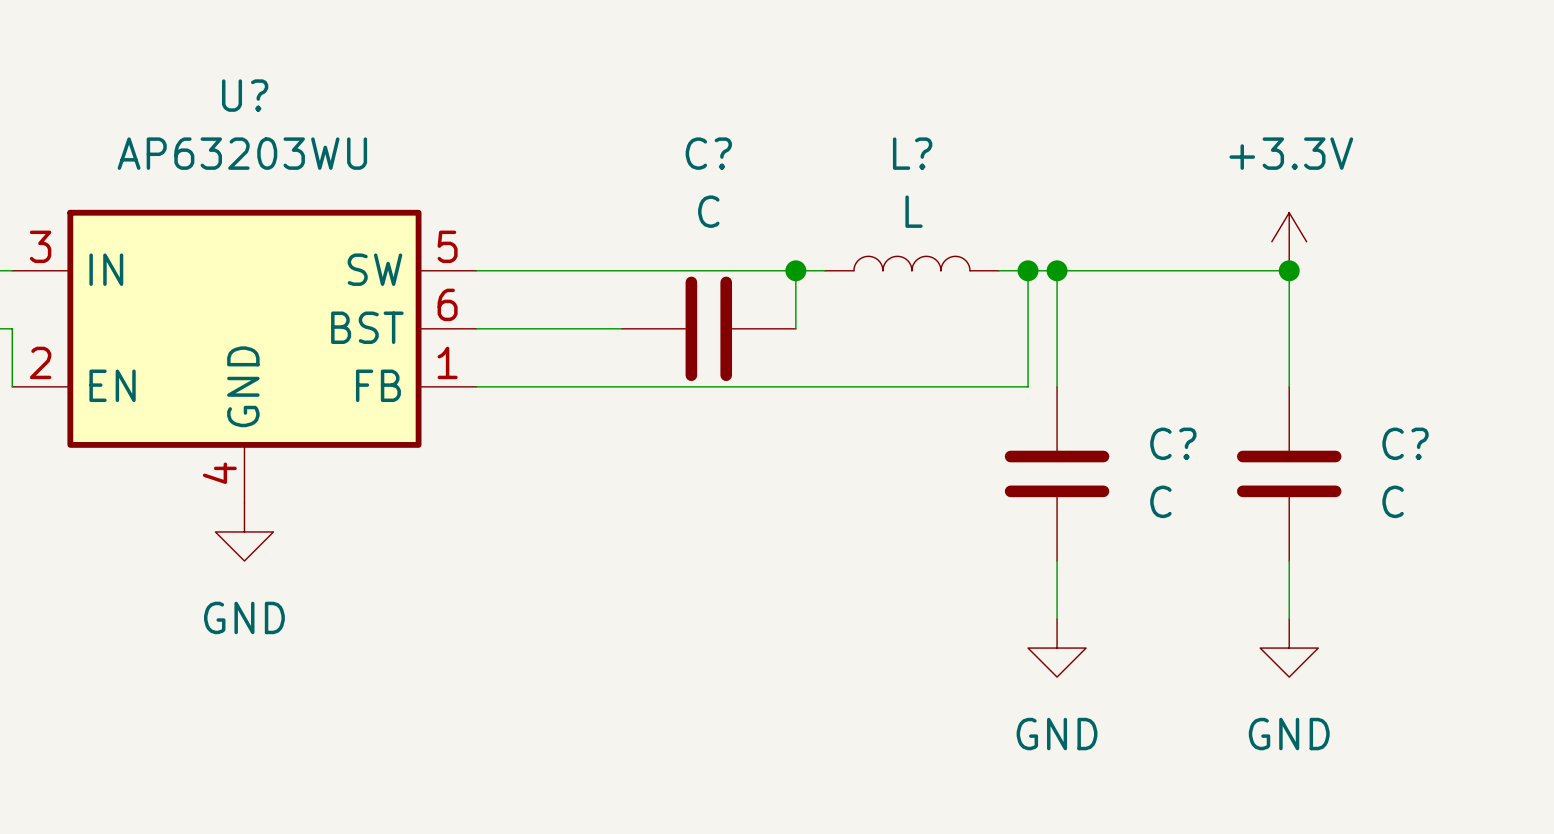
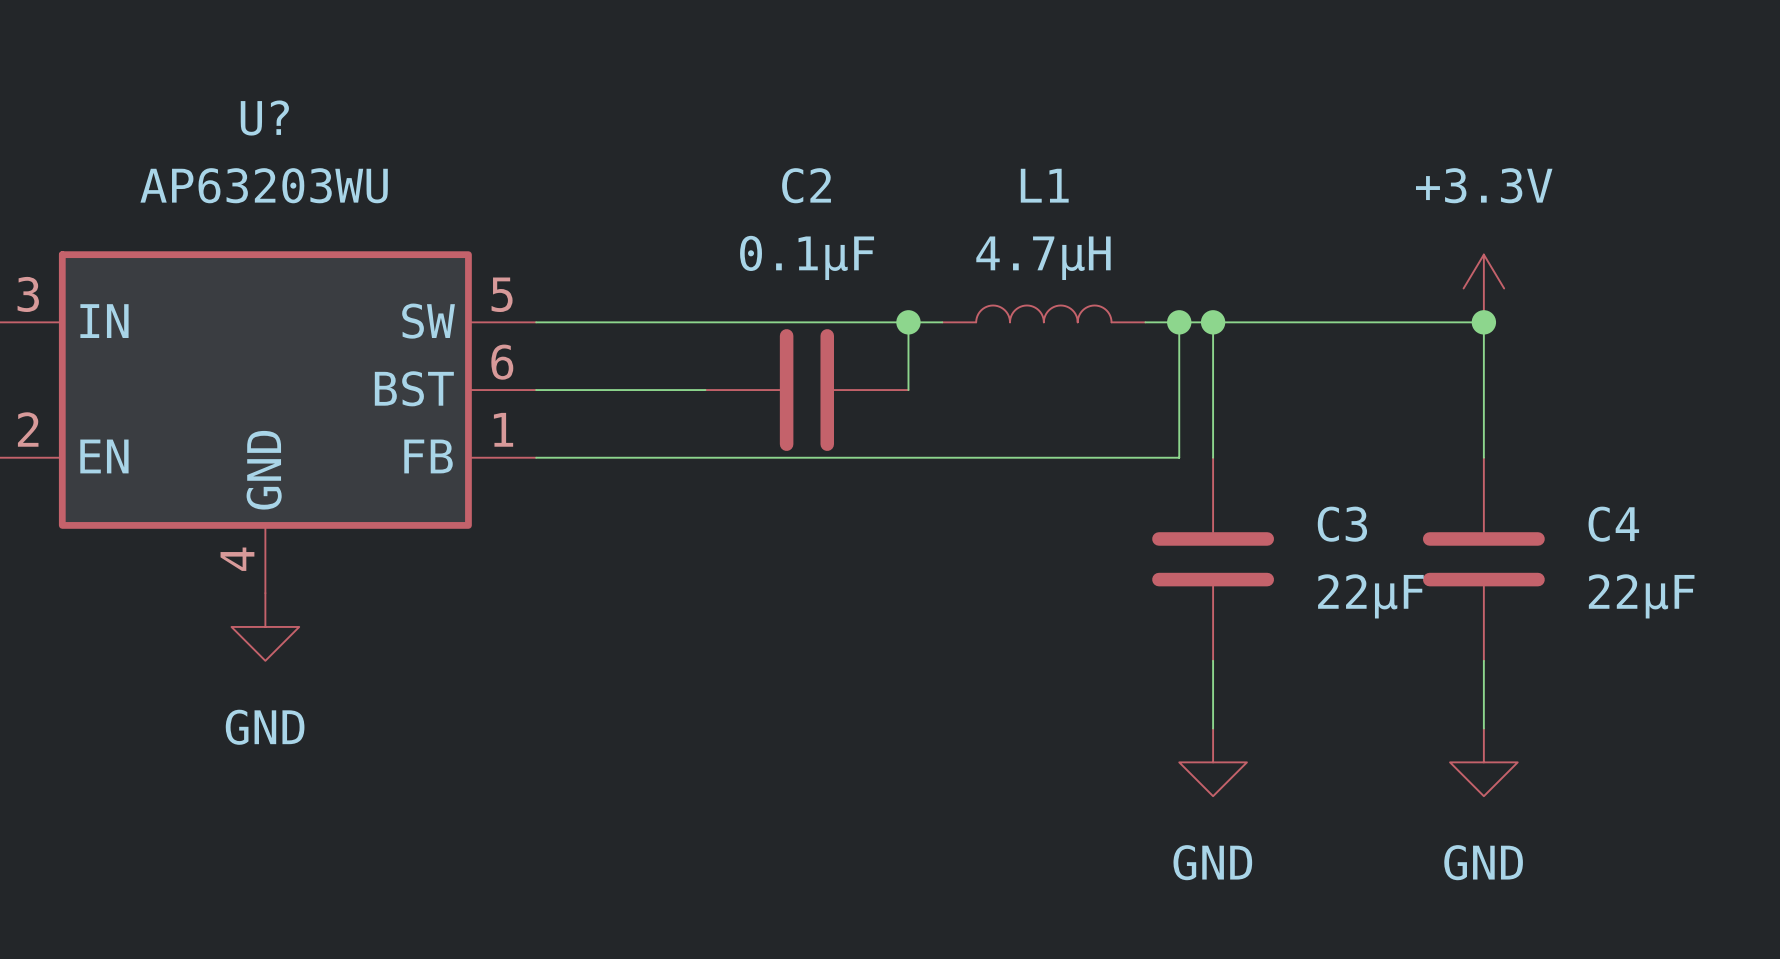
C? name: C? (708, 153) -> C2 (806, 185)
L? name: L? (912, 153) -> L1 (1044, 185)
C? value: C (708, 211) -> 0.1µF (807, 257)
L? value: L (914, 211) -> 4.7µH (1043, 258)
C? name: C? (1173, 443) -> C3 (1342, 524)
C? name: C? (1405, 443) -> C4 (1613, 524)
C? value: C (1160, 501) -> 22µF (1370, 596)
C? value: C (1393, 501) -> 22µF (1641, 596)

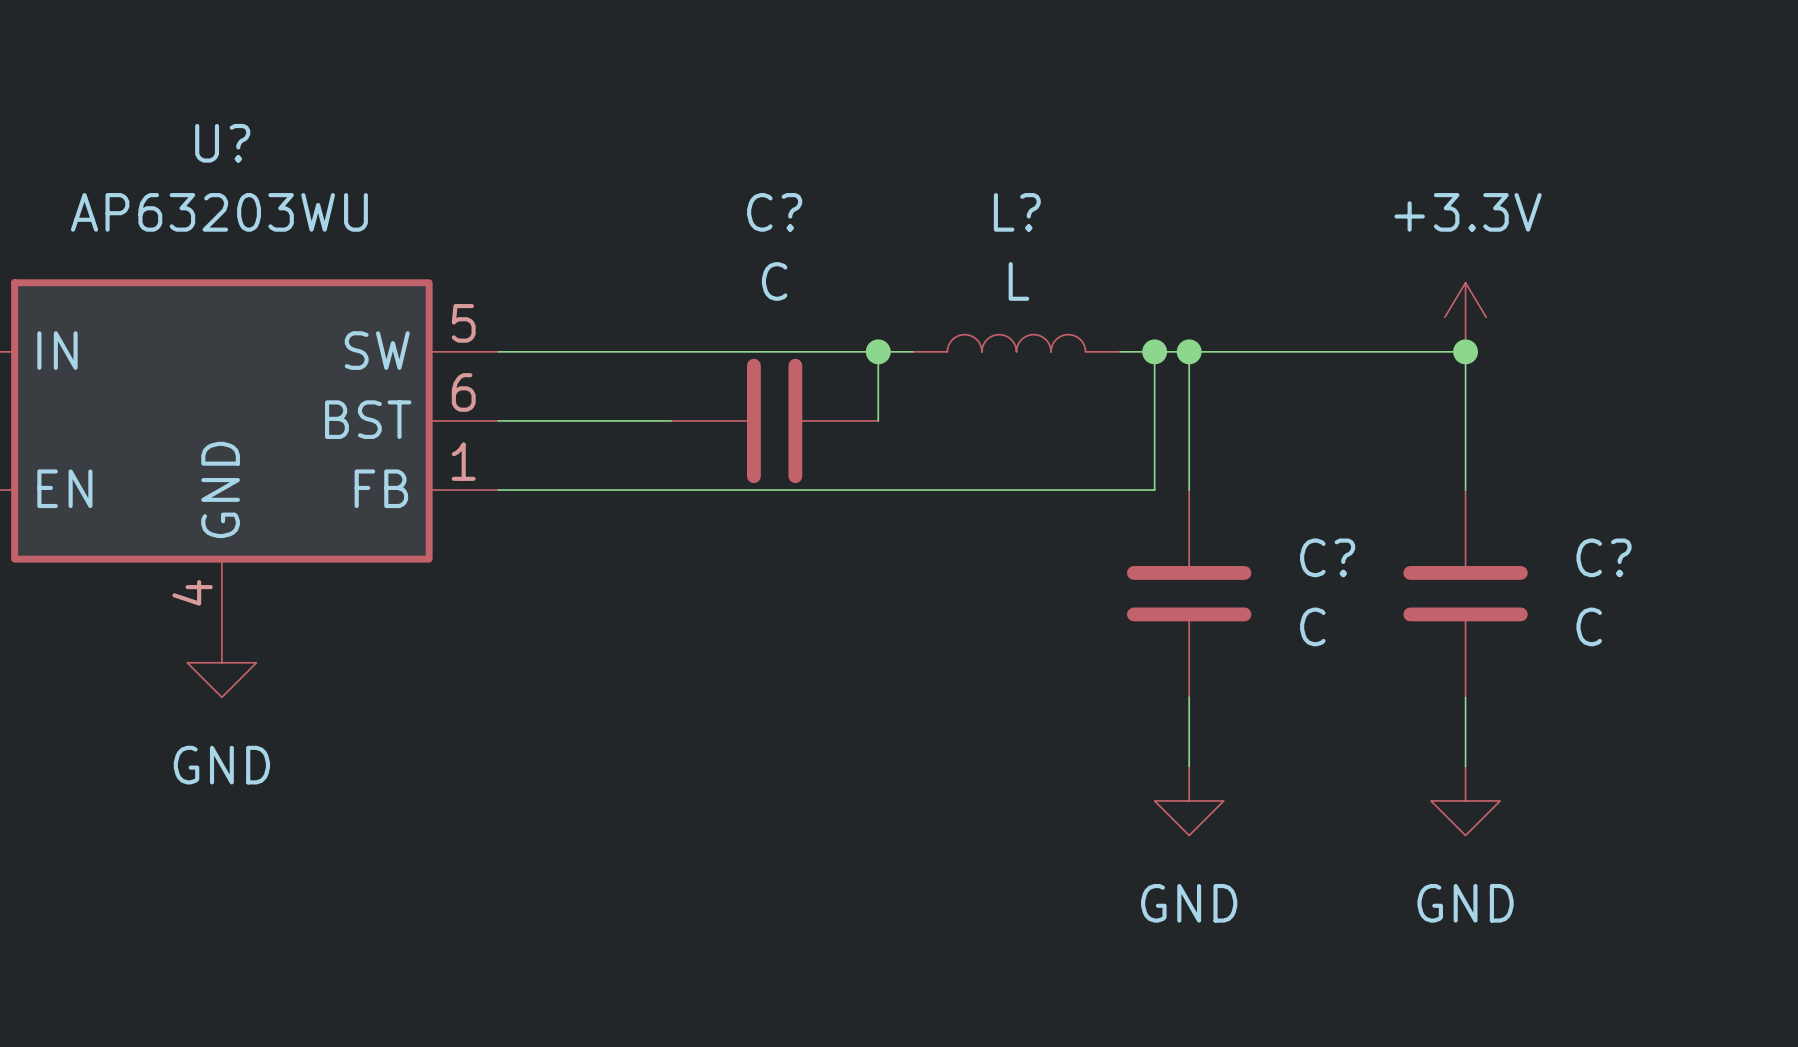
C2 name: C2 (806, 185) -> C? (774, 212)
L1 name: L1 (1044, 185) -> L? (1017, 212)
C2 value: 0.1µF (807, 257) -> C (774, 281)
L1 value: 4.7µH (1043, 258) -> L (1018, 281)
C3 name: C3 (1342, 524) -> C? (1327, 557)
C4 name: C4 (1613, 524) -> C? (1604, 557)
C3 value: 22µF (1370, 596) -> C (1312, 626)
C4 value: 22µF (1641, 596) -> C (1589, 626)

